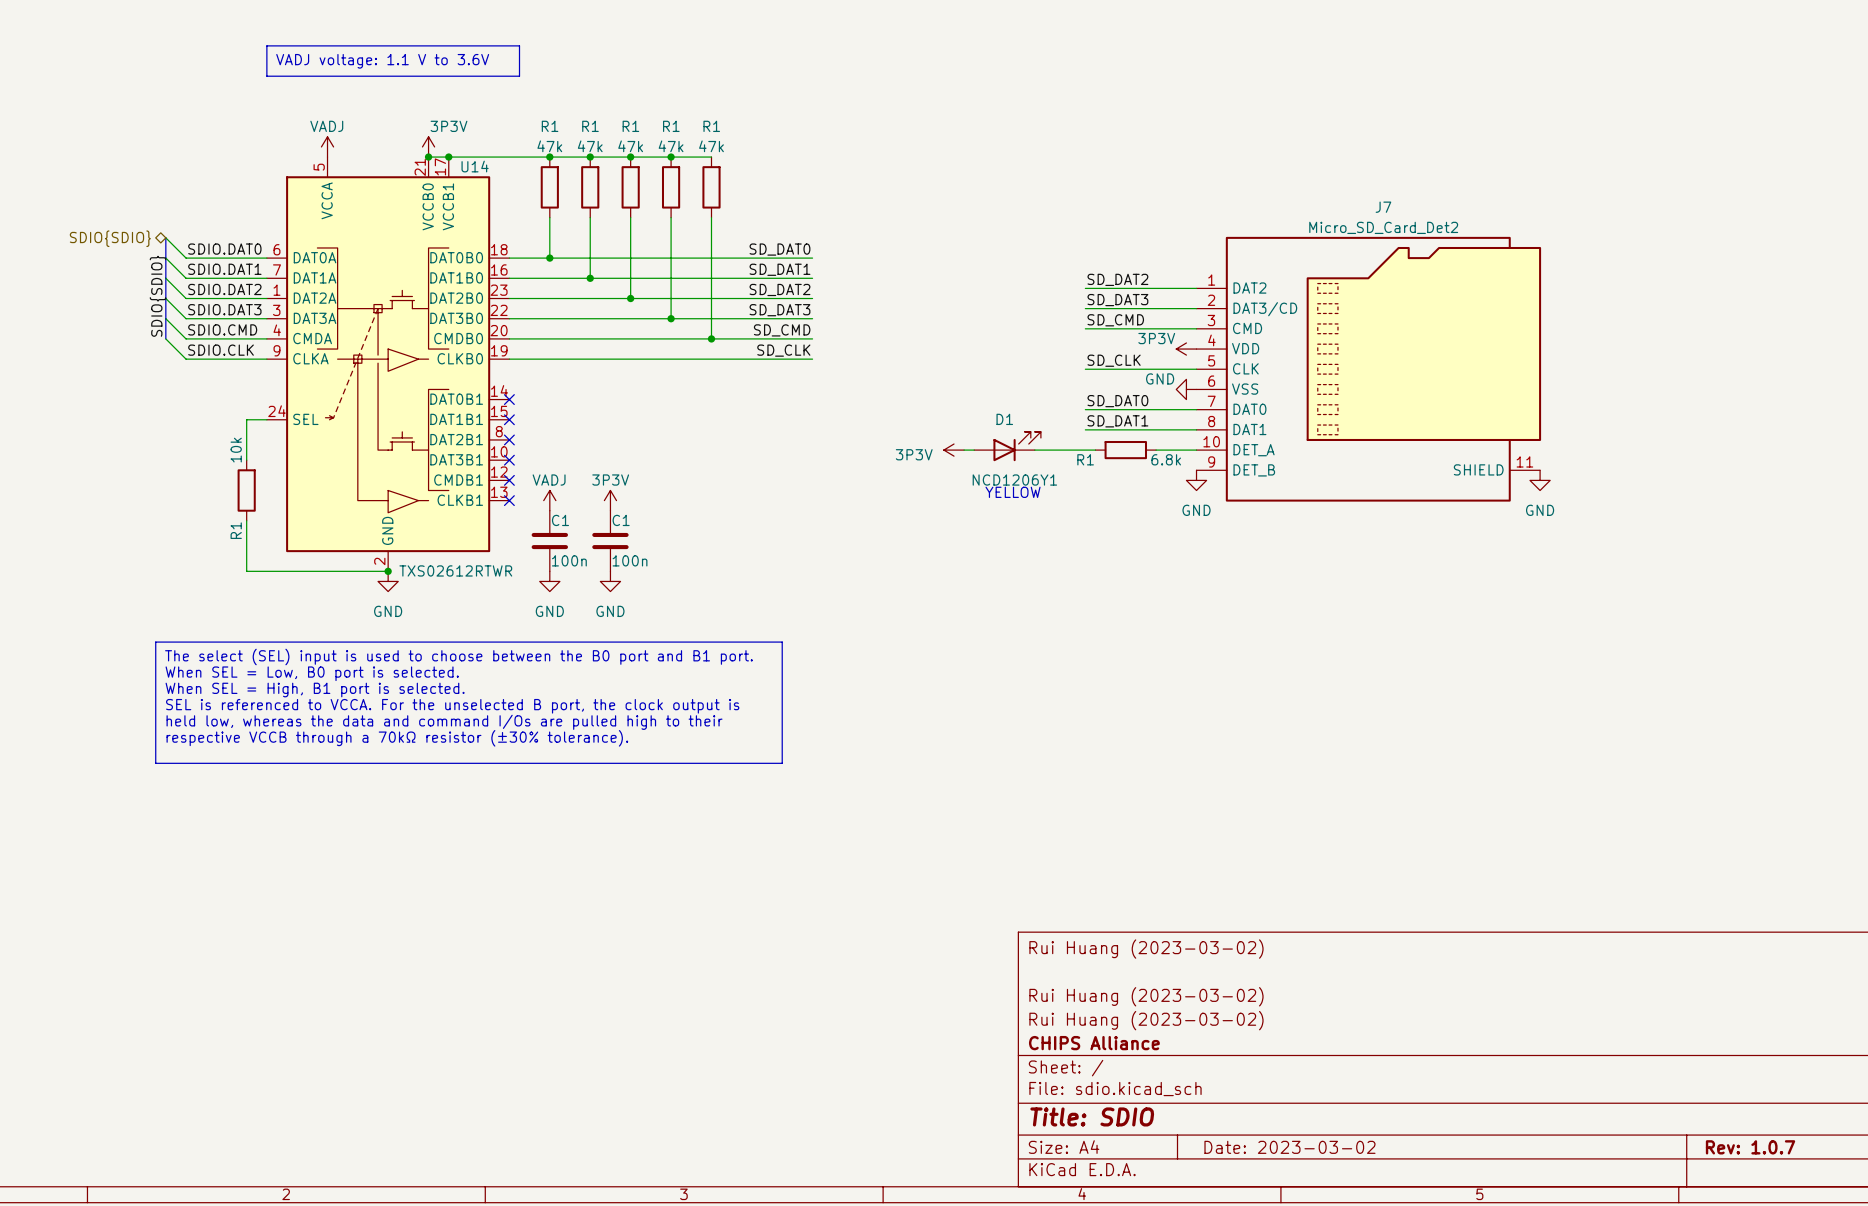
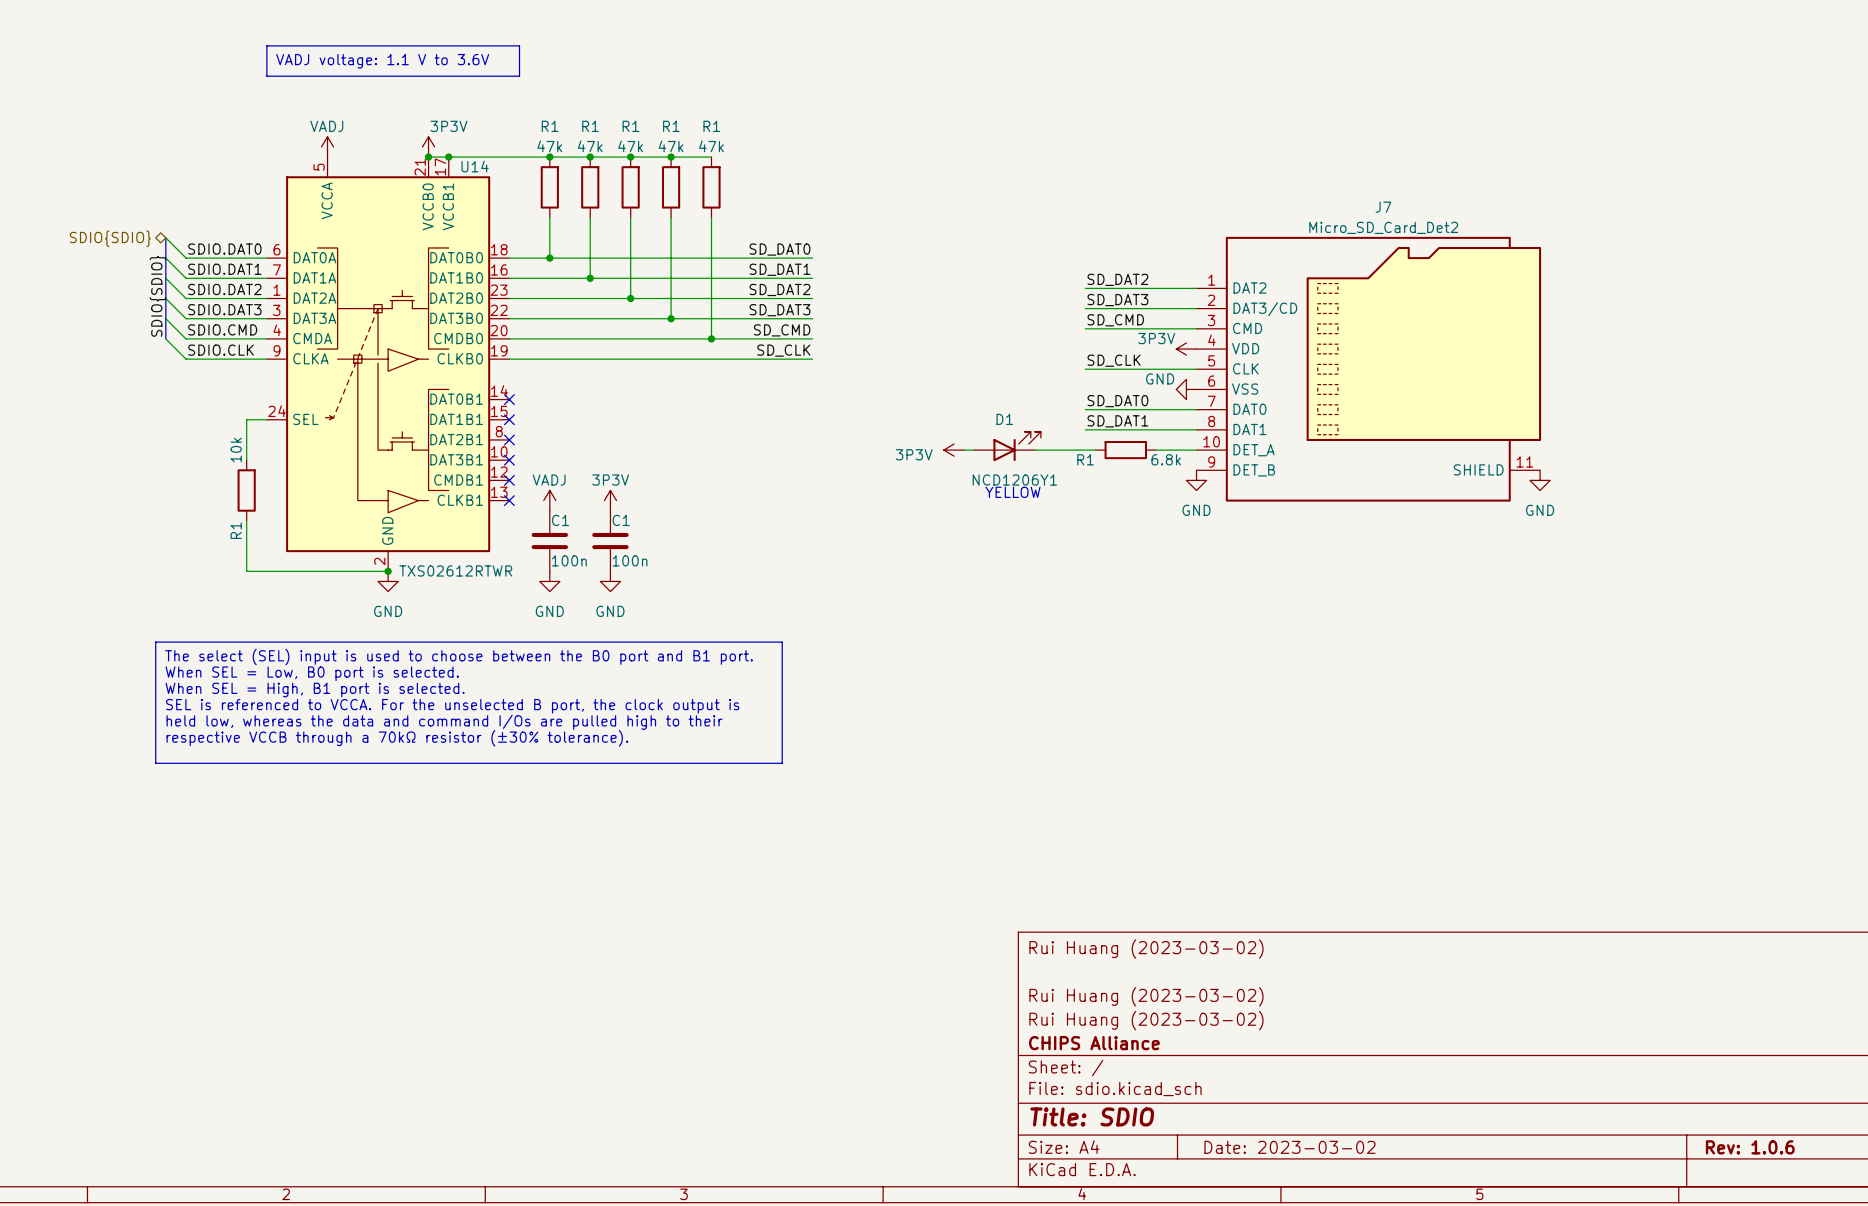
title block: Rev: 1.0.7 (1750, 1147) -> Rev: 1.0.6 (1750, 1147)

